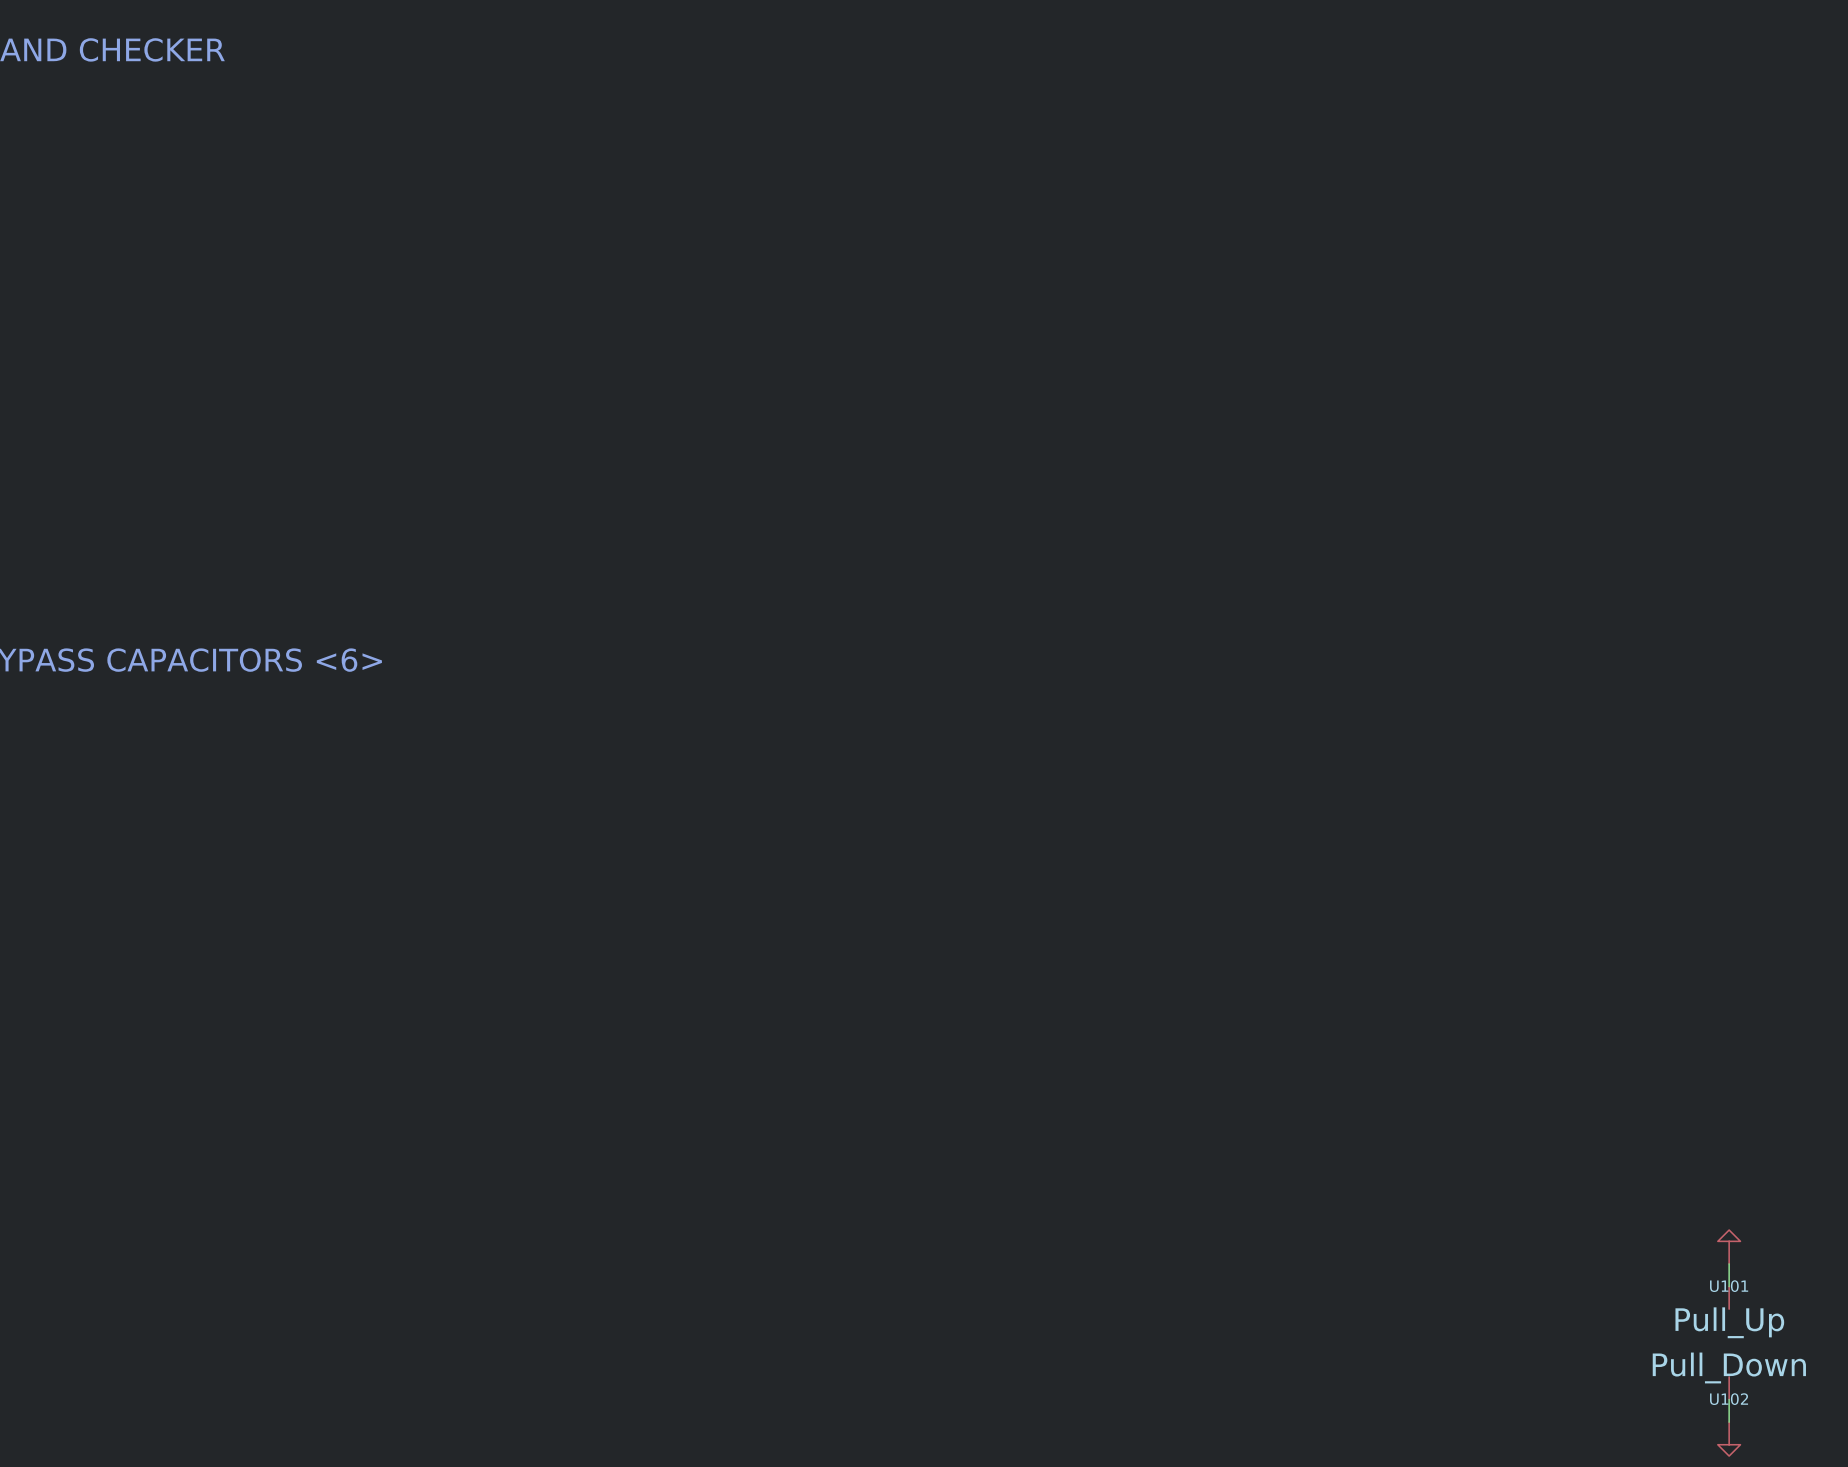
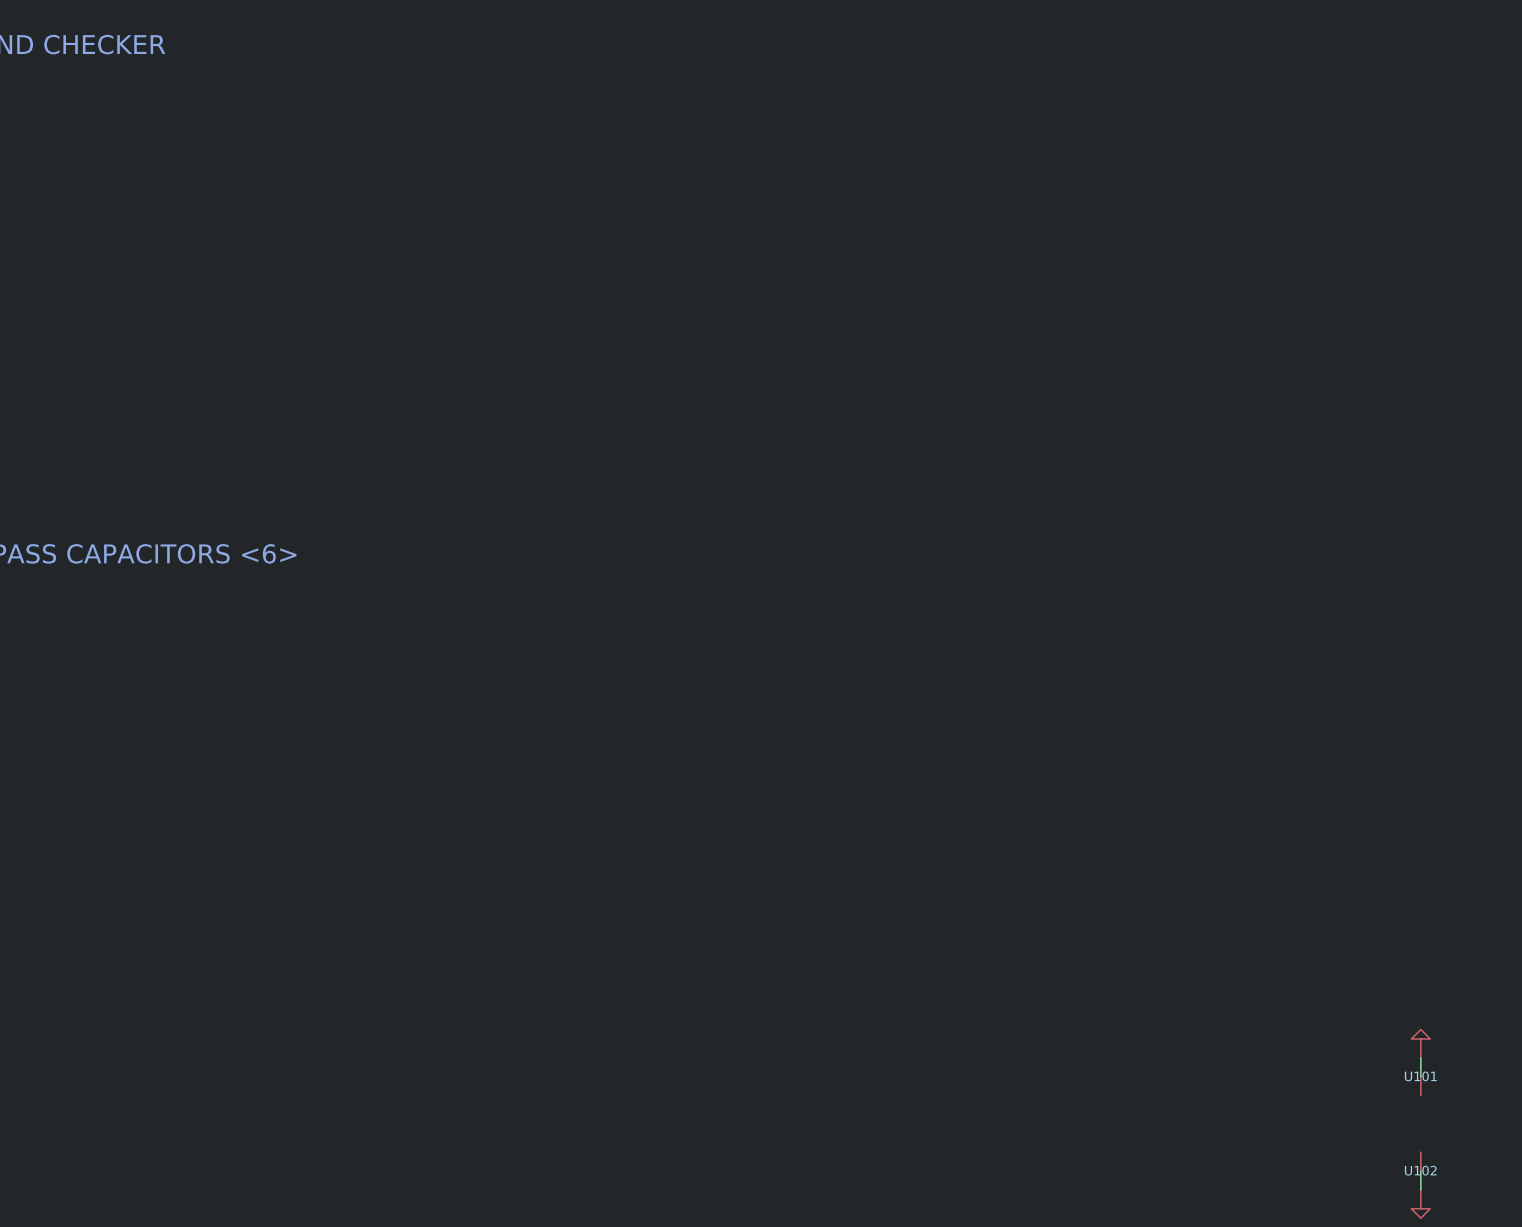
U101 value: Pull_Up (1729, 1322) -> none
U102 value: Pull_Down (1729, 1367) -> none

